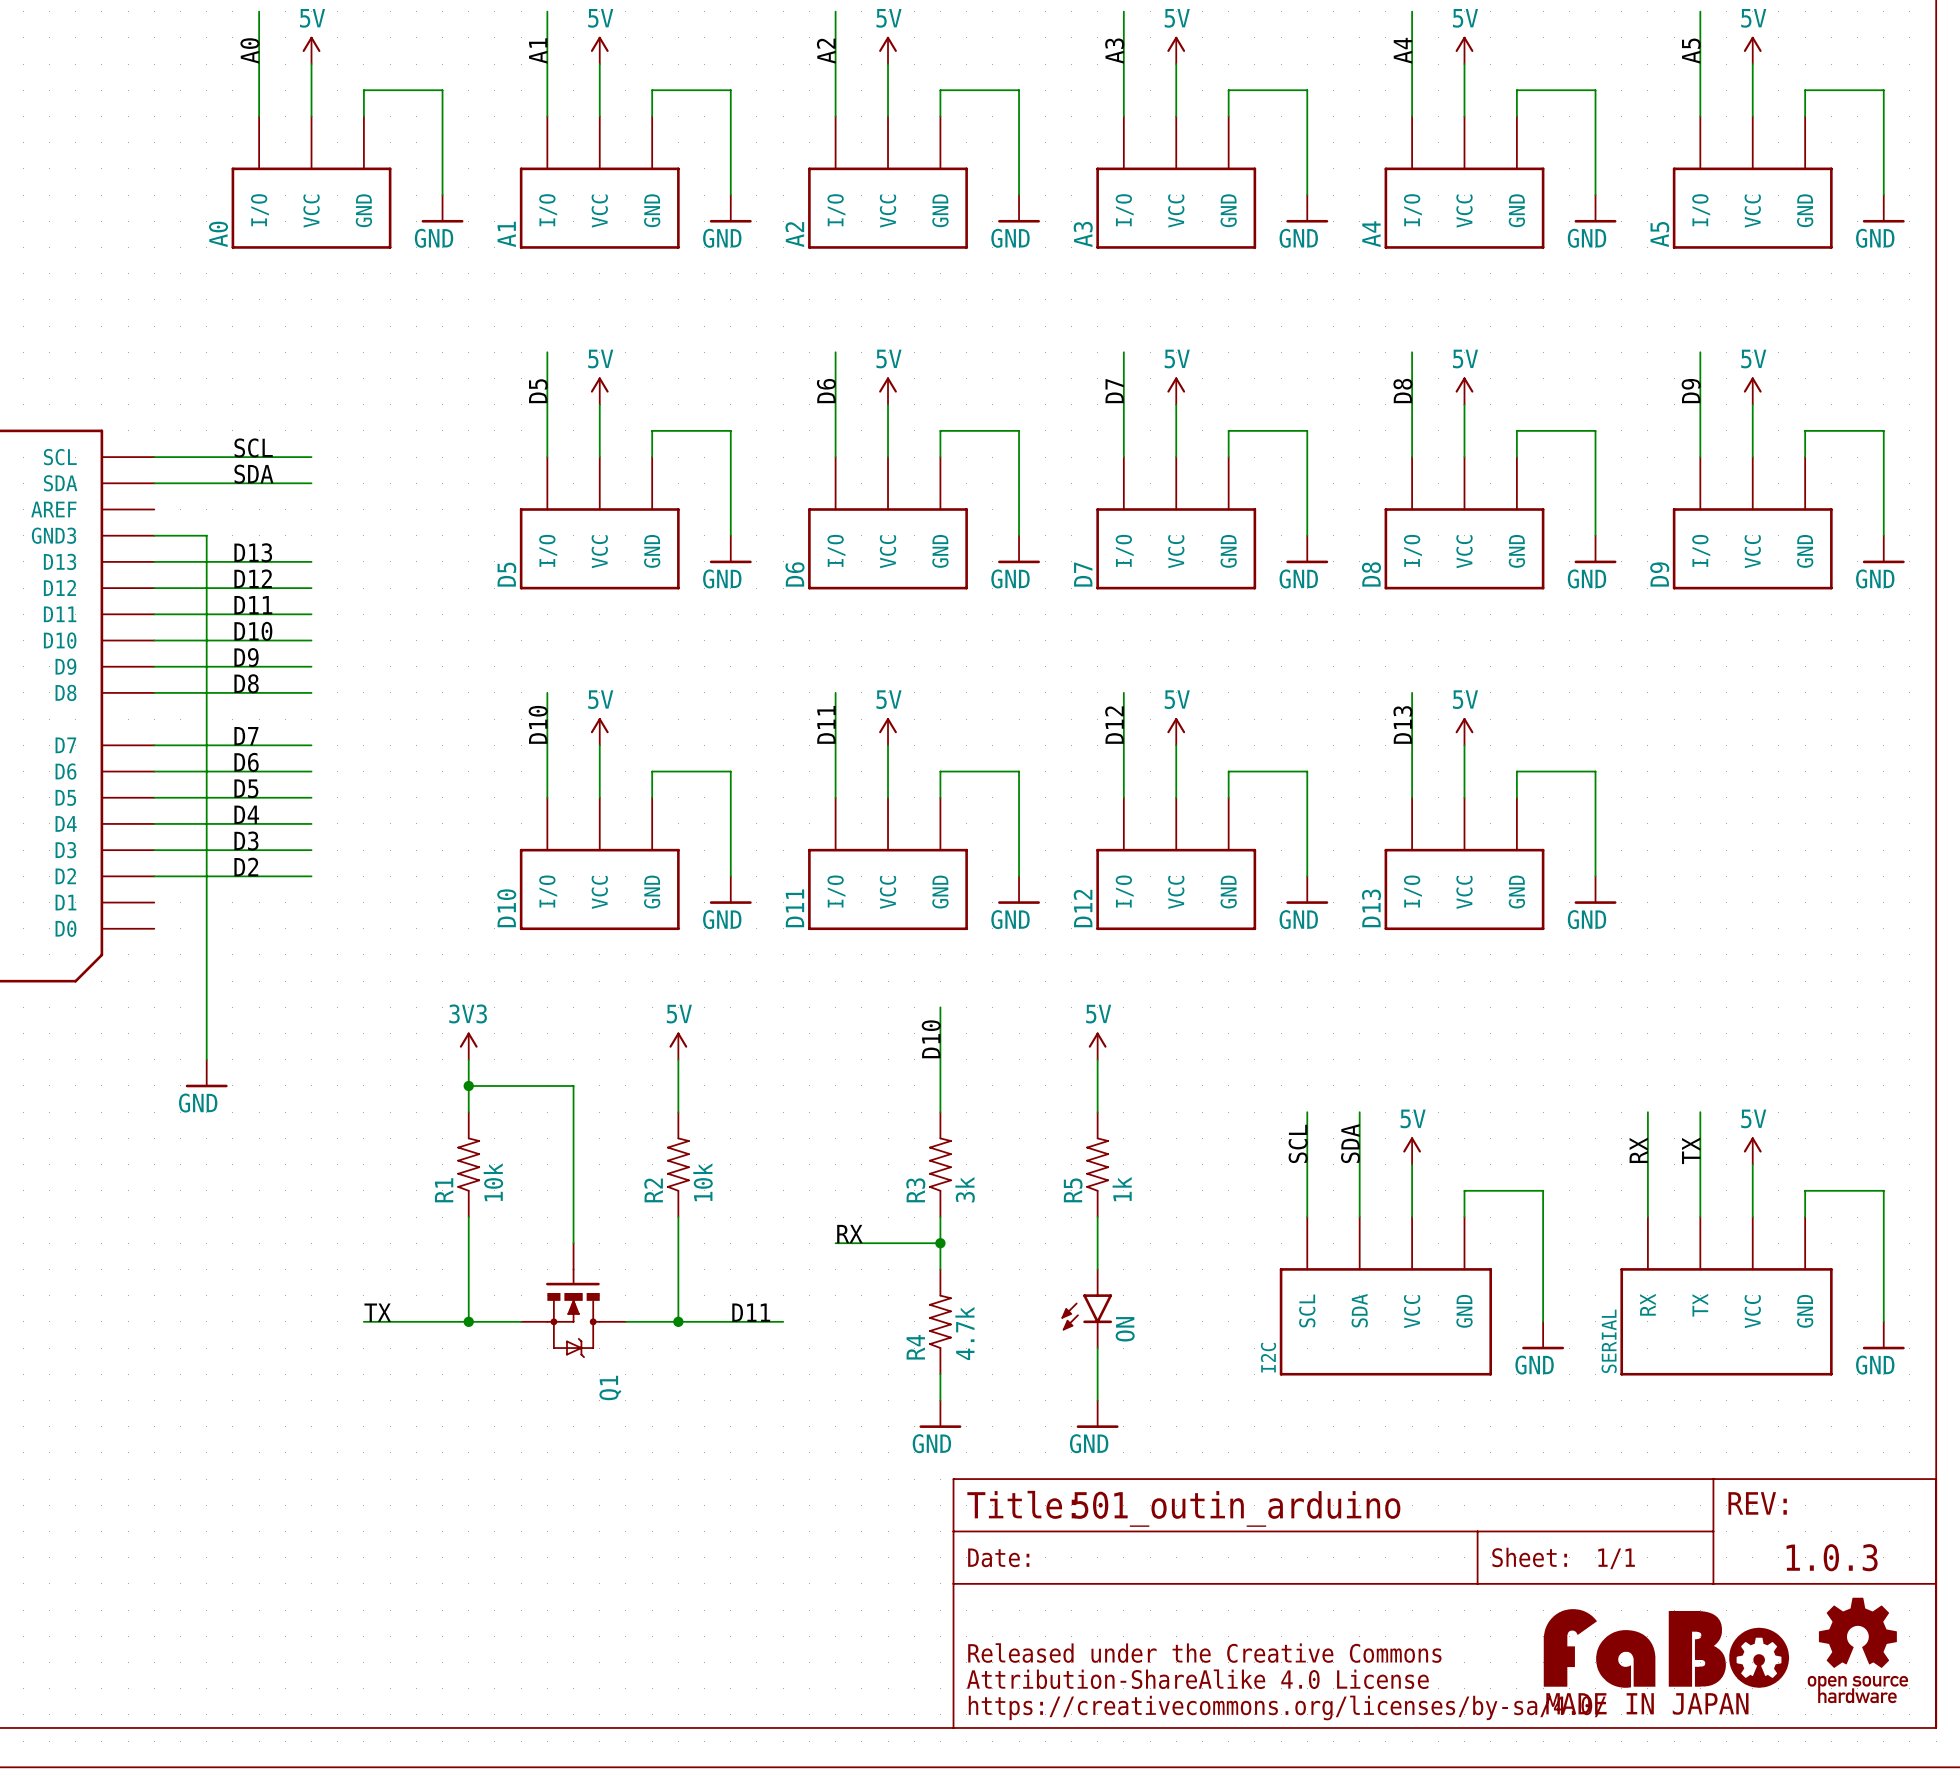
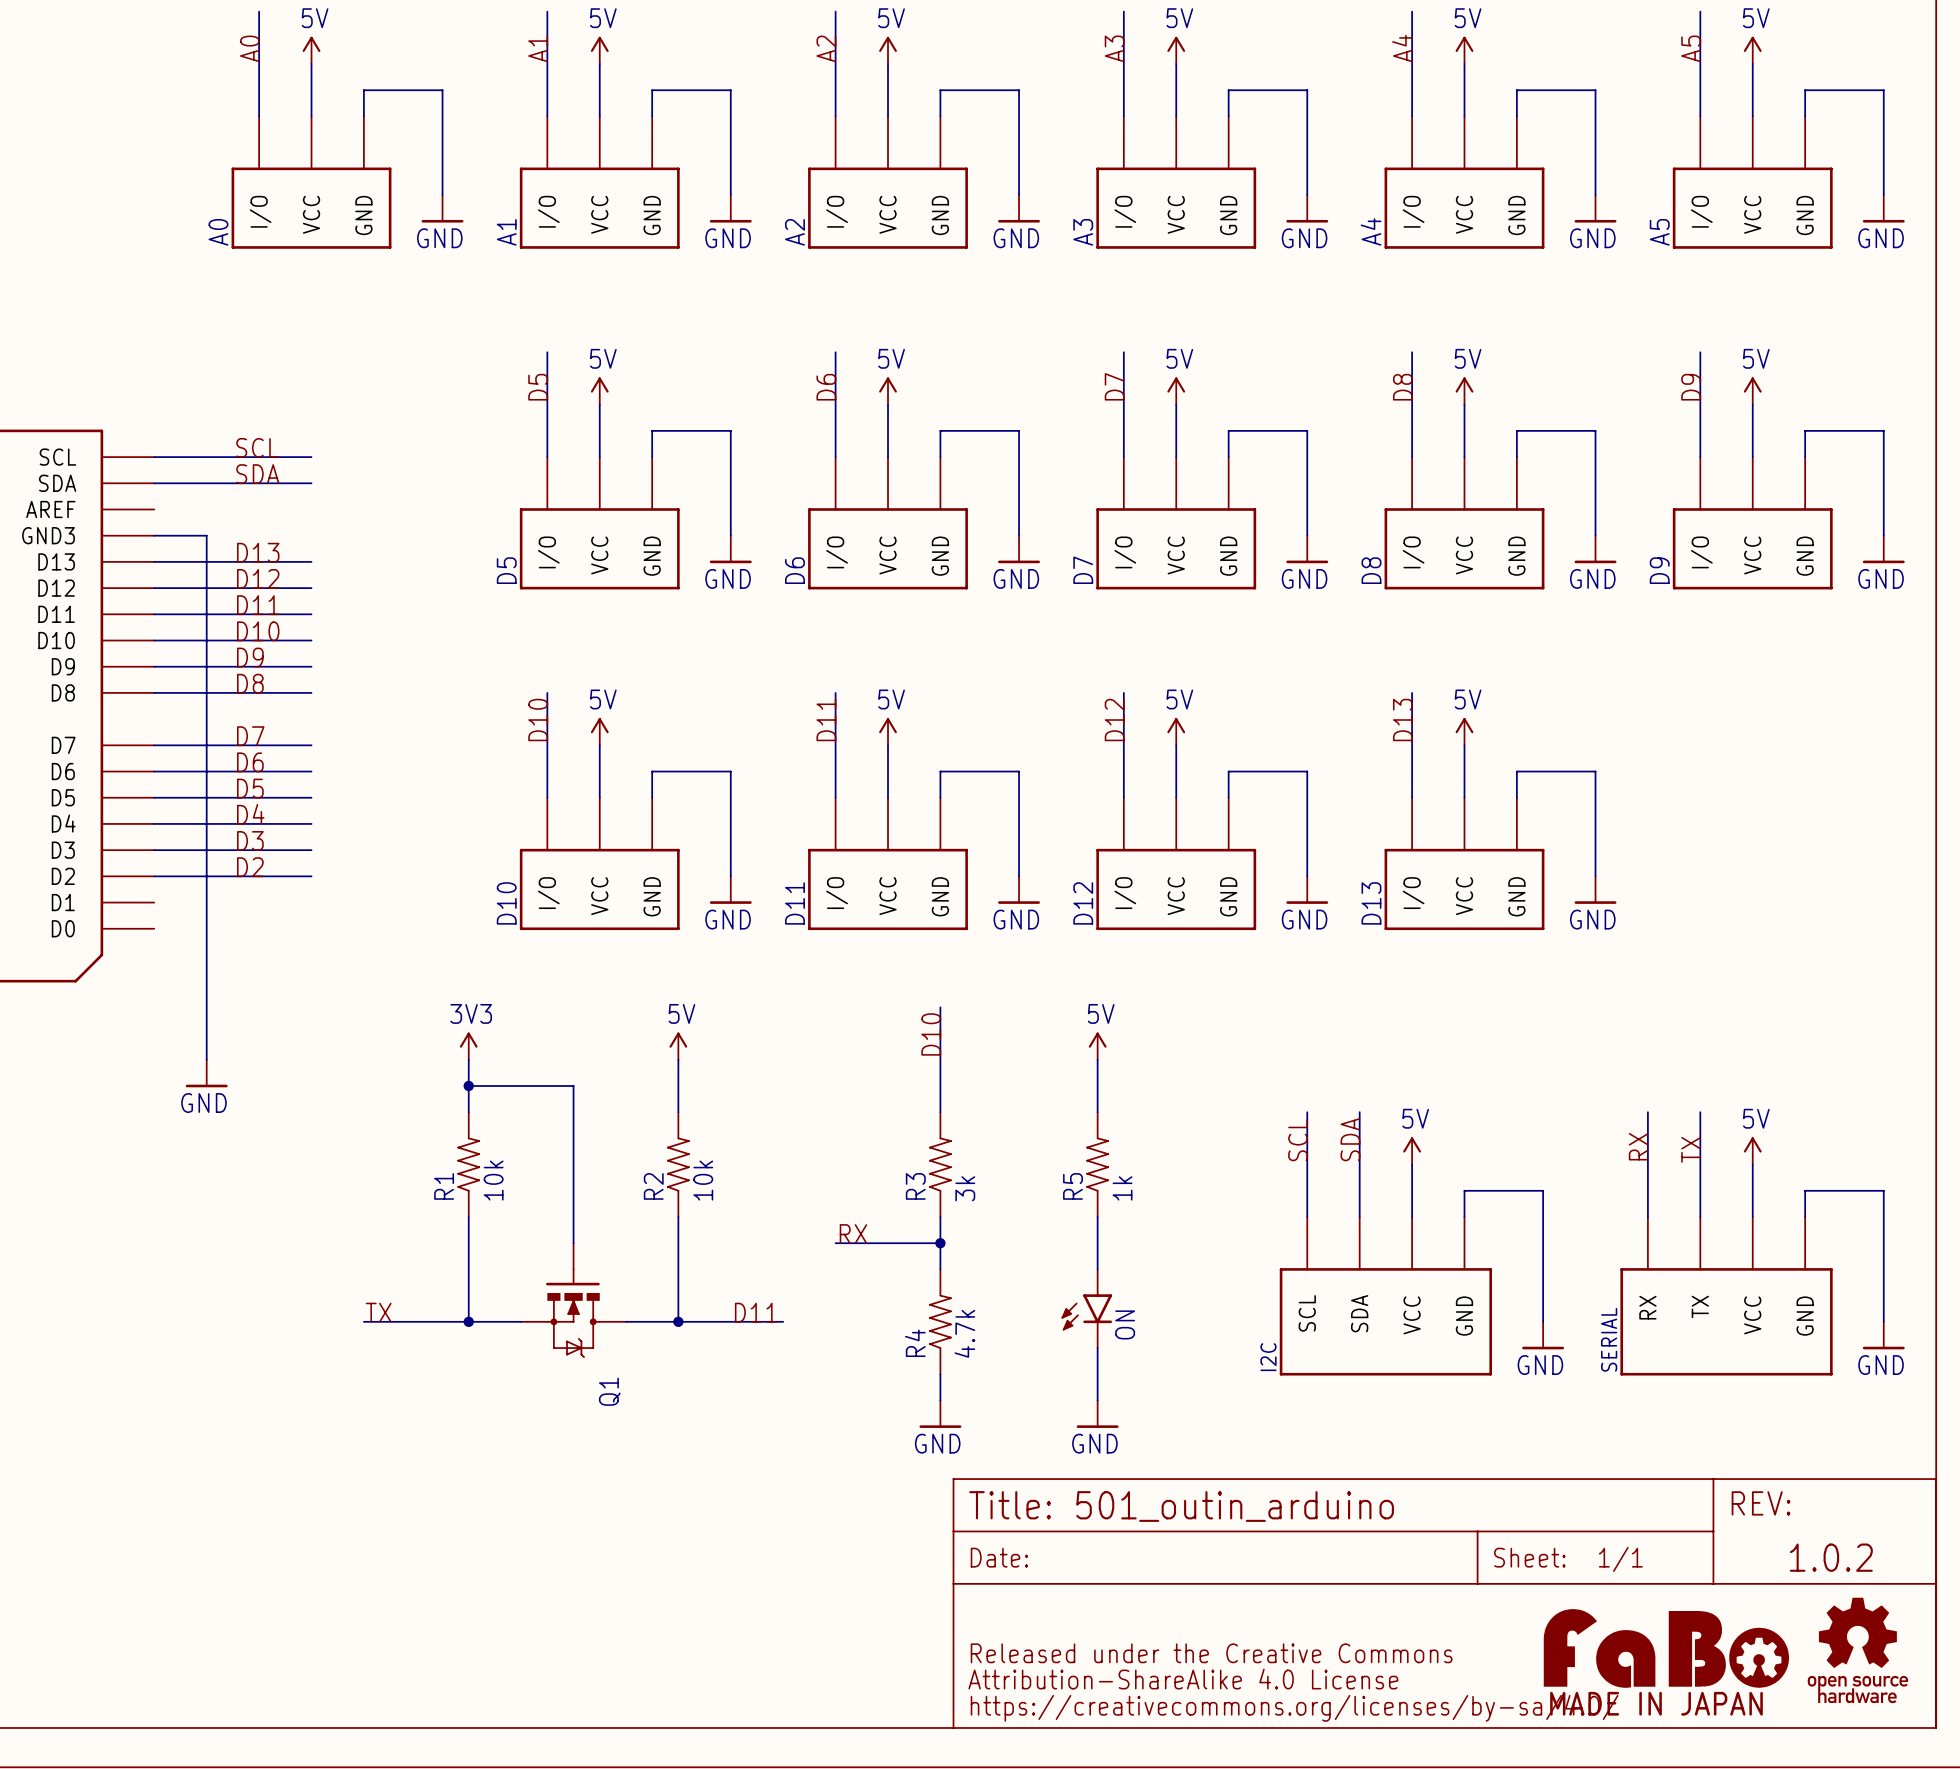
text: 1.0.3 (1832, 1557) -> 1.0.2 (1831, 1557)

